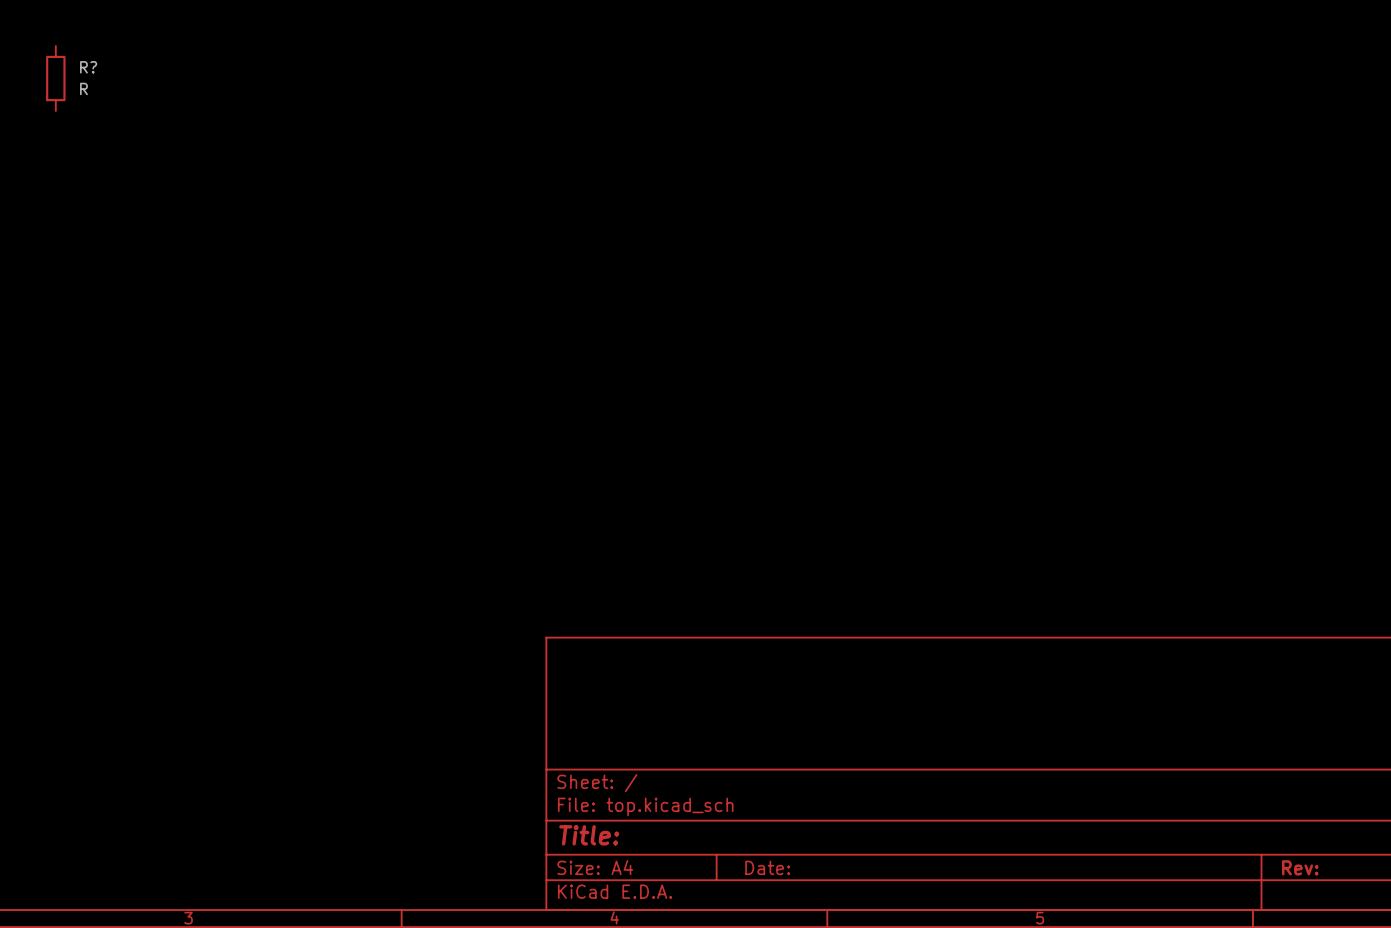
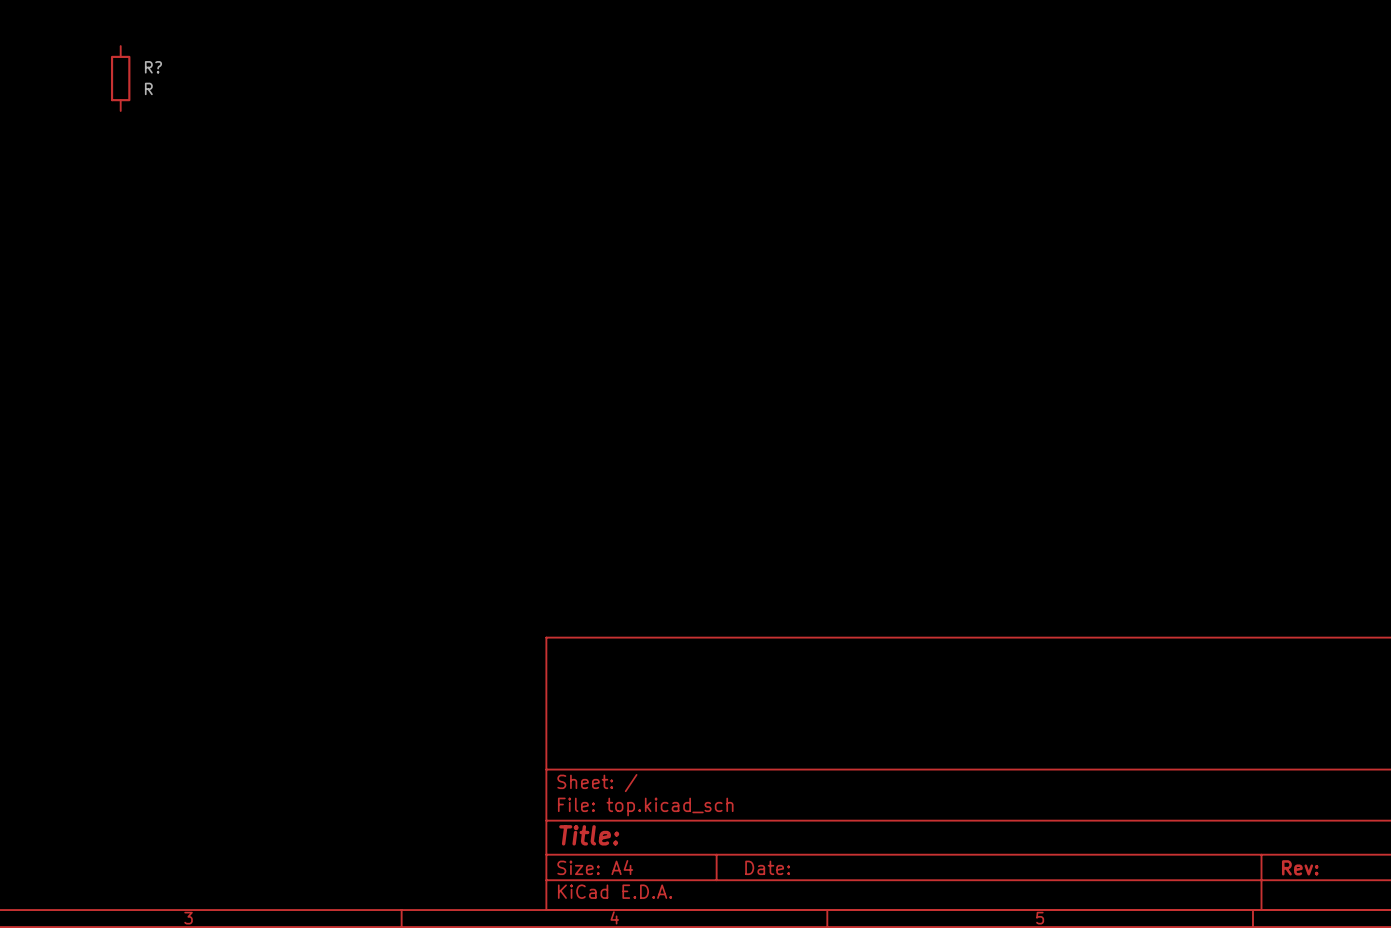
R? position: (55, 78) -> (120, 78)

